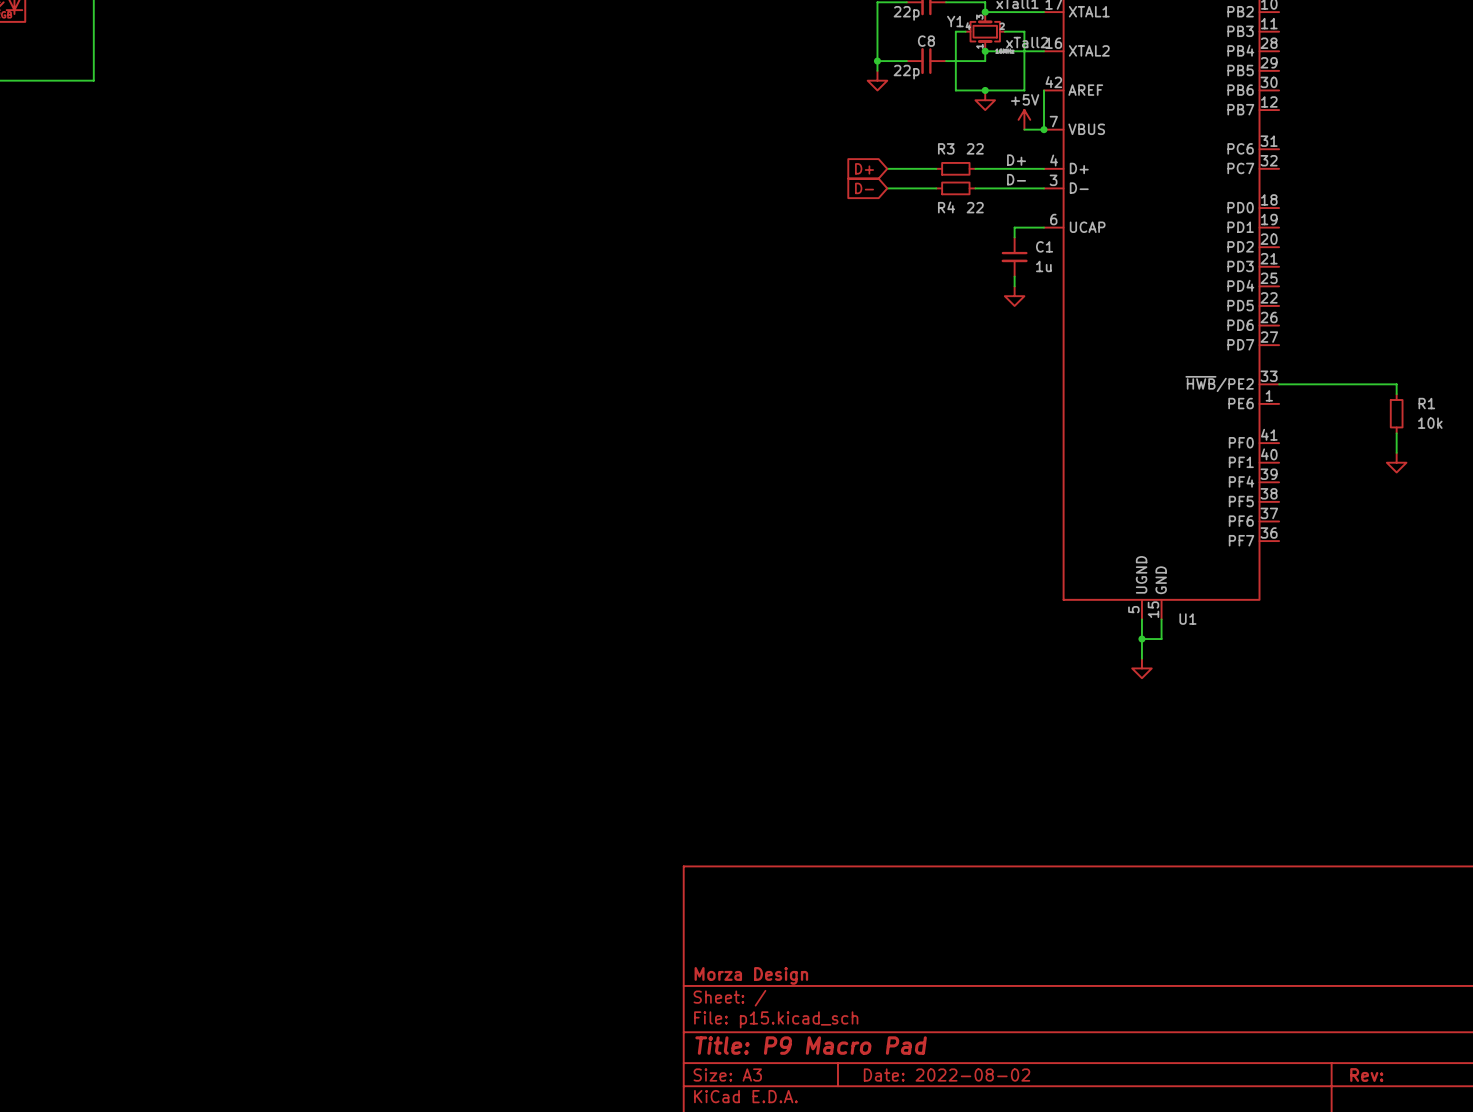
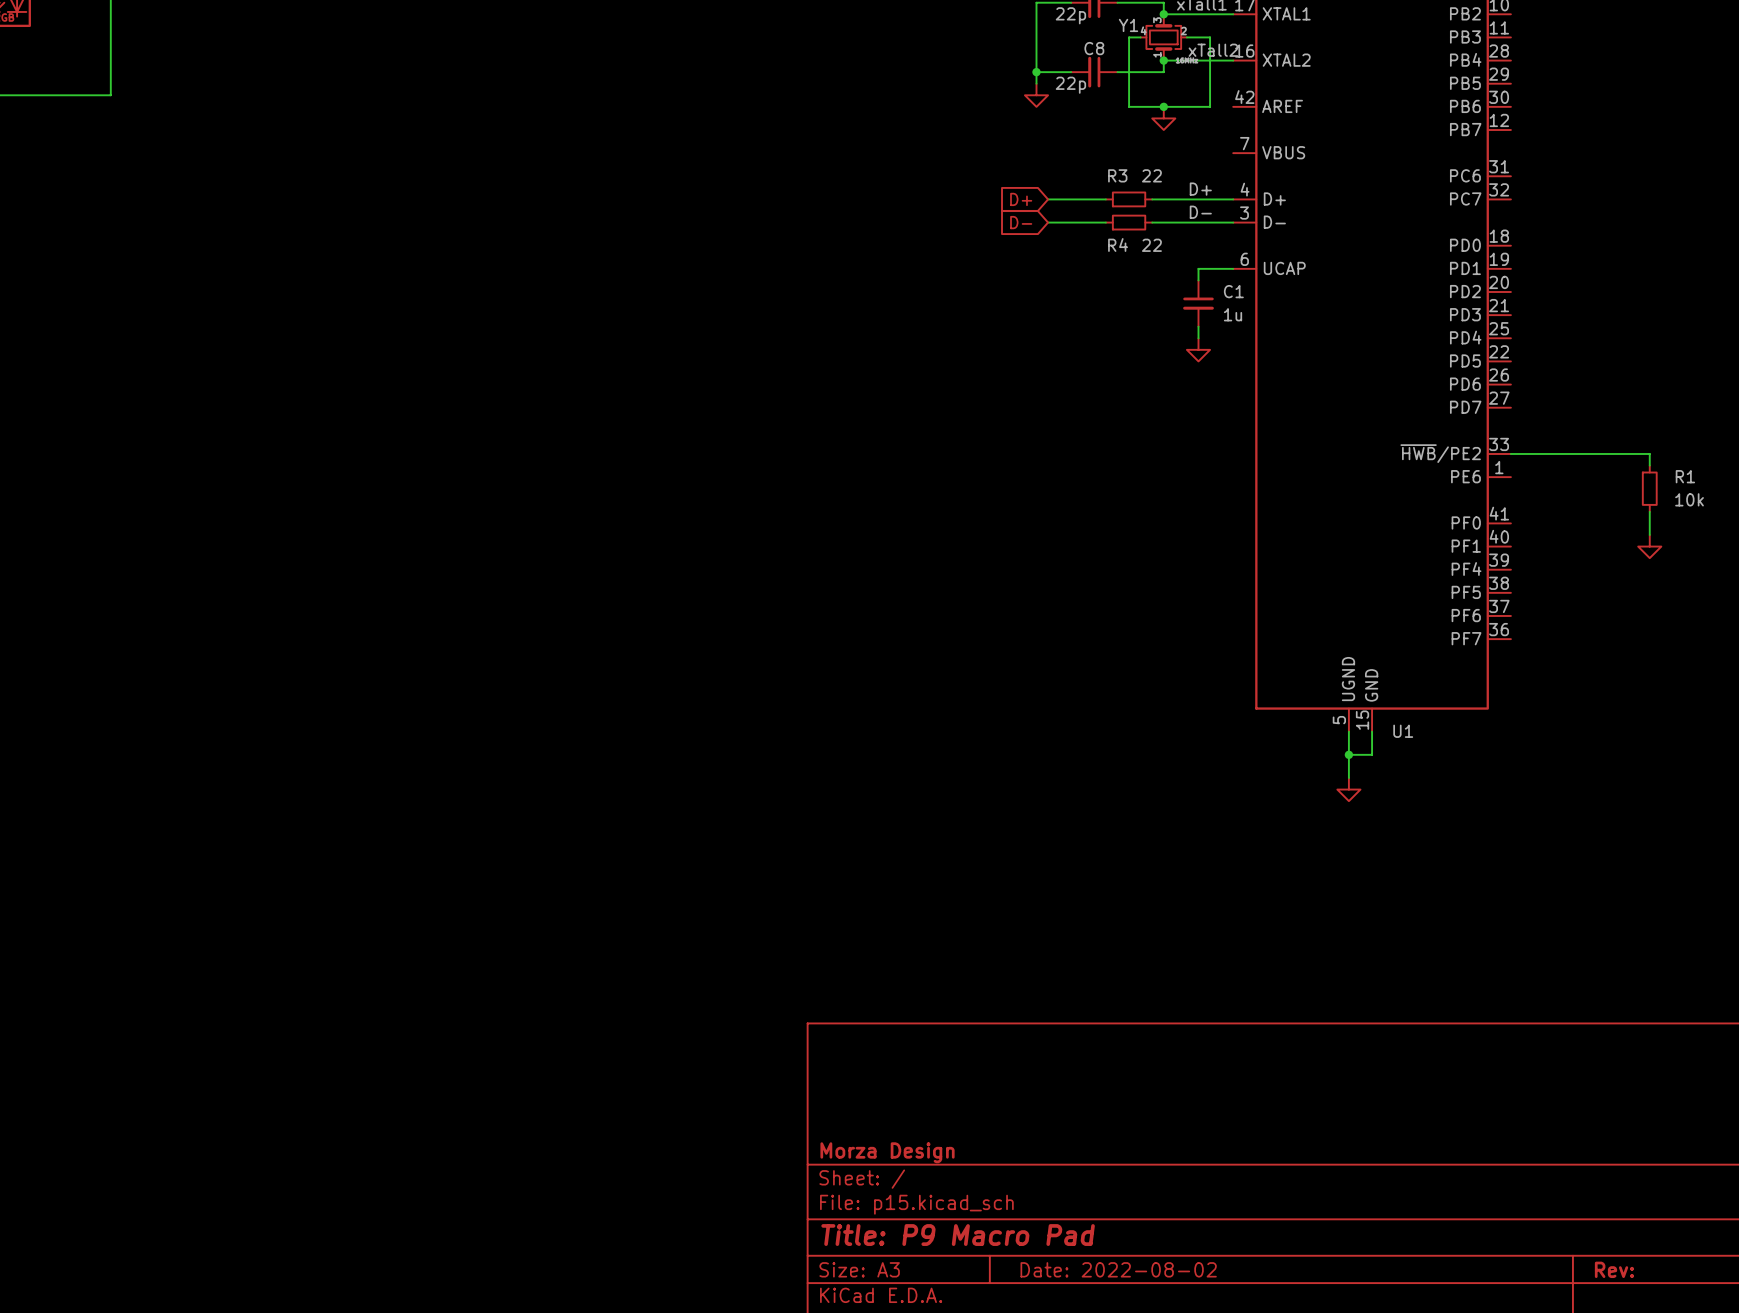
wire: (1044, 90) (1044, 129) (1024, 129) -> none
power symbol: +5V (1024, 119) -> none
junction: (1044, 129) -> none

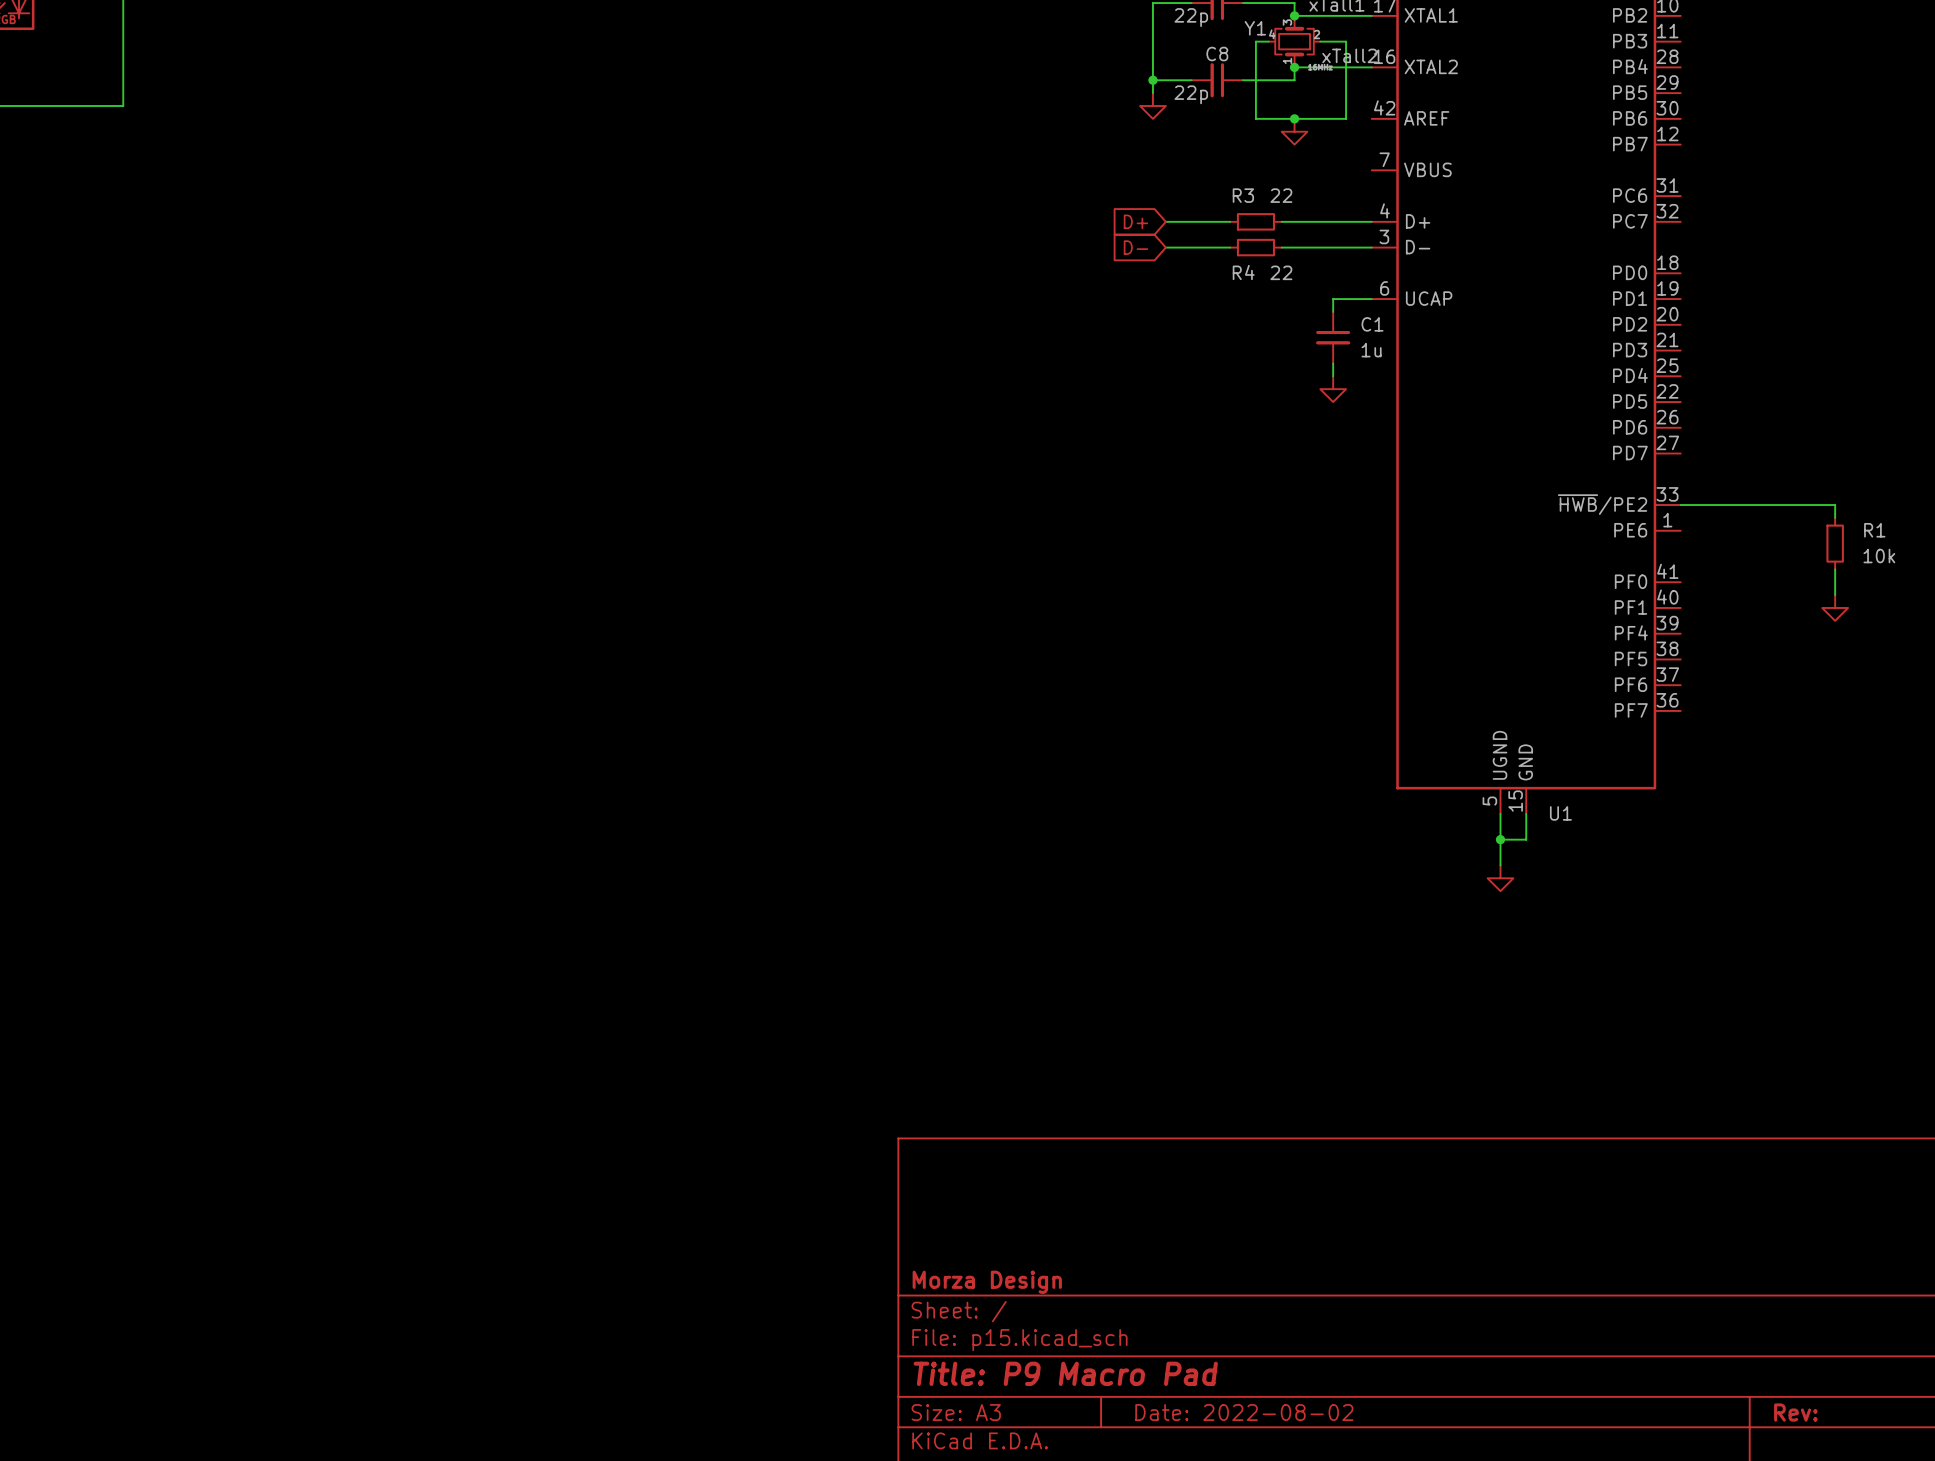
label: D+ (1200, 189) -> none
label: D- (1200, 212) -> none

